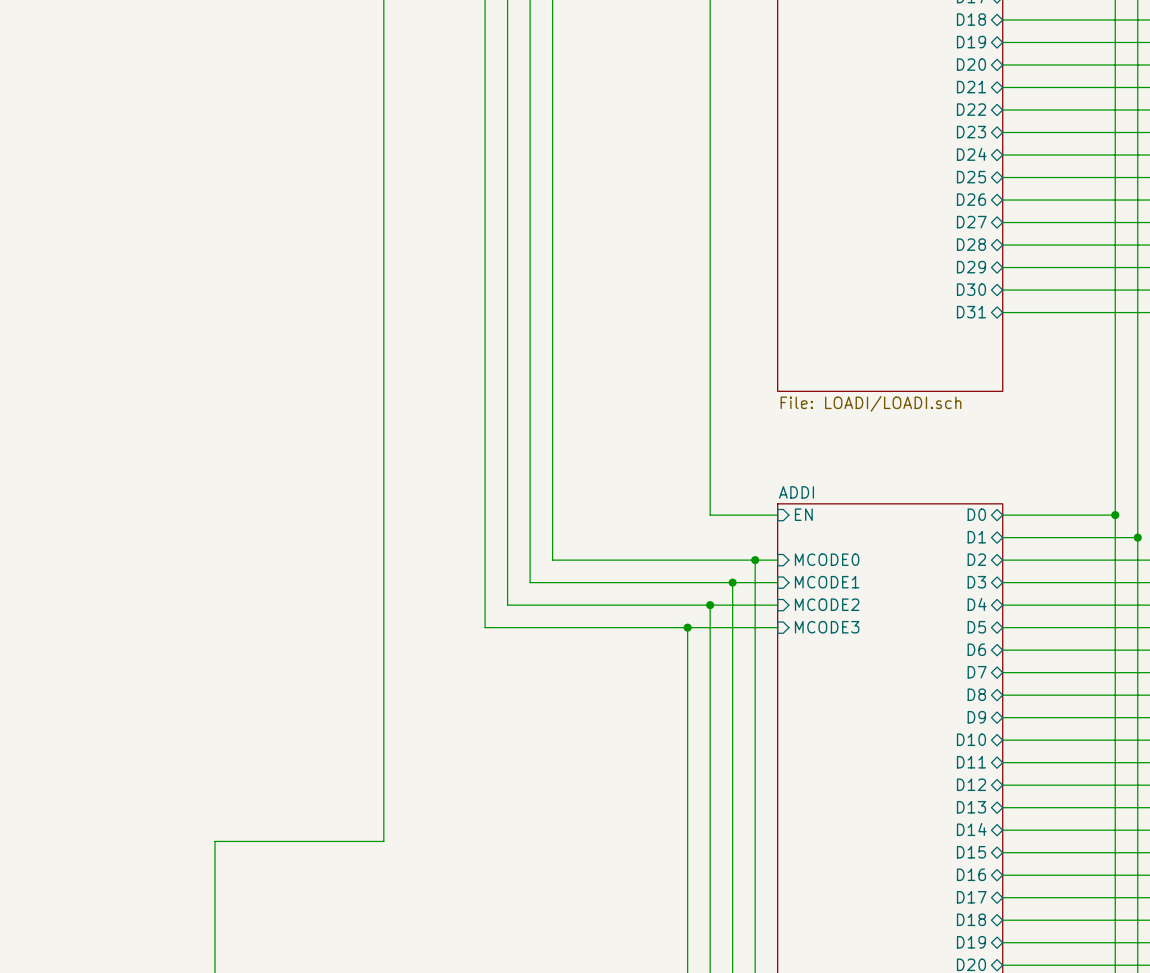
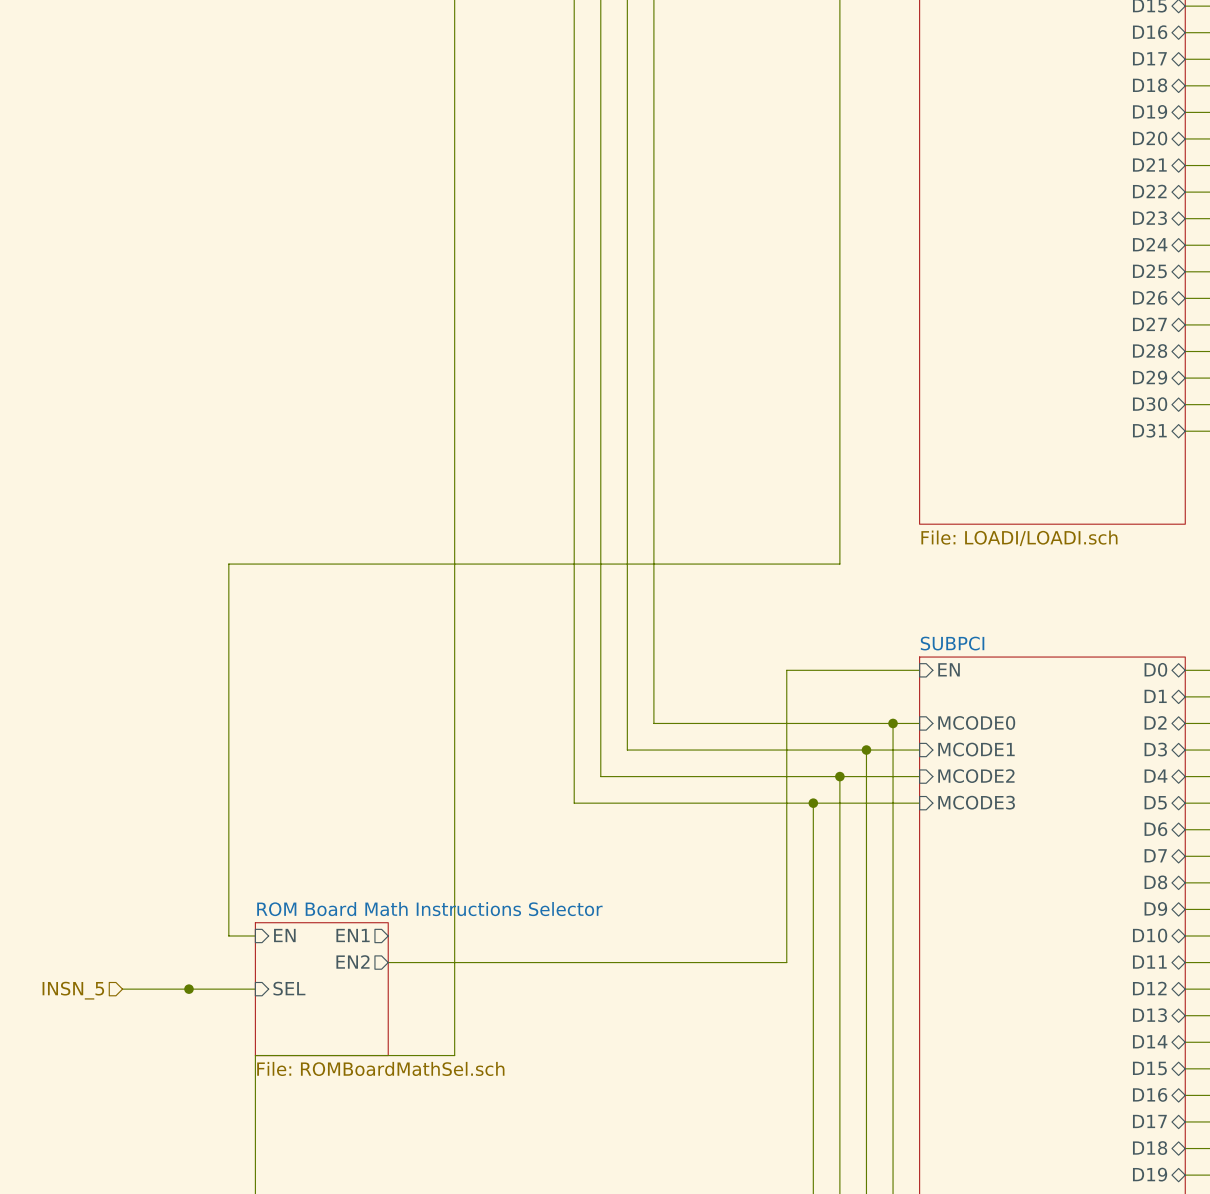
wire: (710, 425) (710, 515) -> (388, 962) (786, 962) (786, 670) (839, 670)
wire: none -> (839, 564) (228, 564) (228, 936) (255, 936)
sheet ADDI name: ADDI (796, 492) -> SUBPCI (952, 643)
sheet pin: none -> EN (284, 935)
sheet pin: none -> EN1 (353, 935)
sheet pin: none -> EN2 (352, 961)
sheet pin: none -> SEL (289, 988)
hierarchical label: none -> INSN_5 (73, 990)
wire: none -> (122, 989) (255, 989)
junction: none -> (188, 989)
sheet ROM Board Math Instructions Selector: none -> File: ROMBoardMathSel.sch (321, 989)

